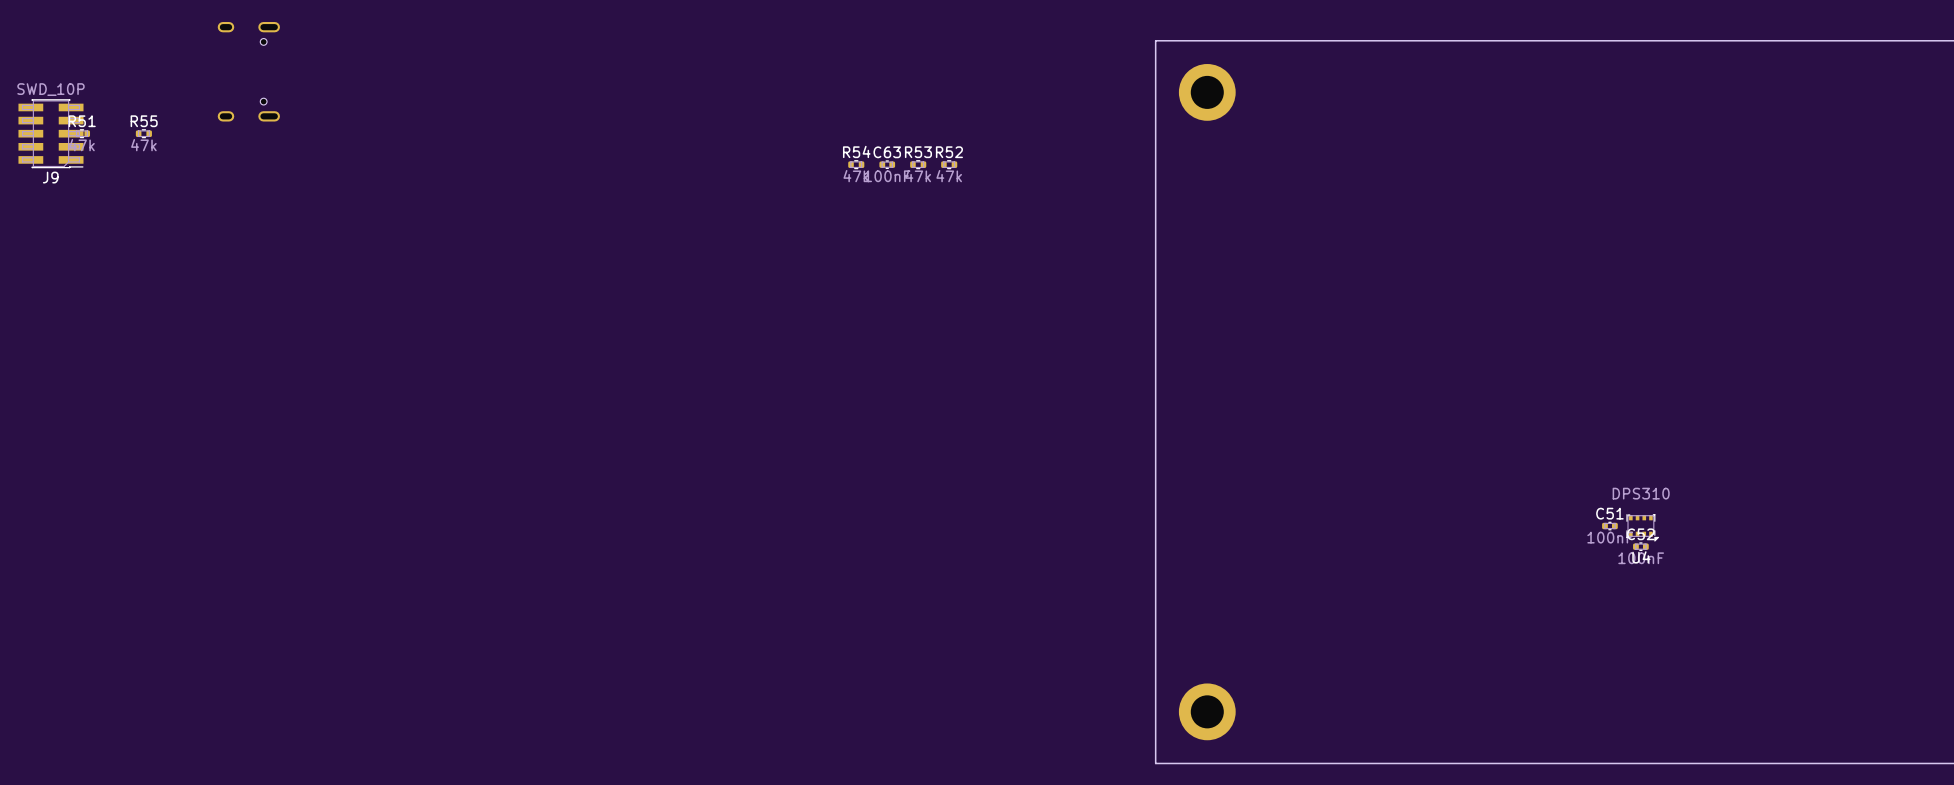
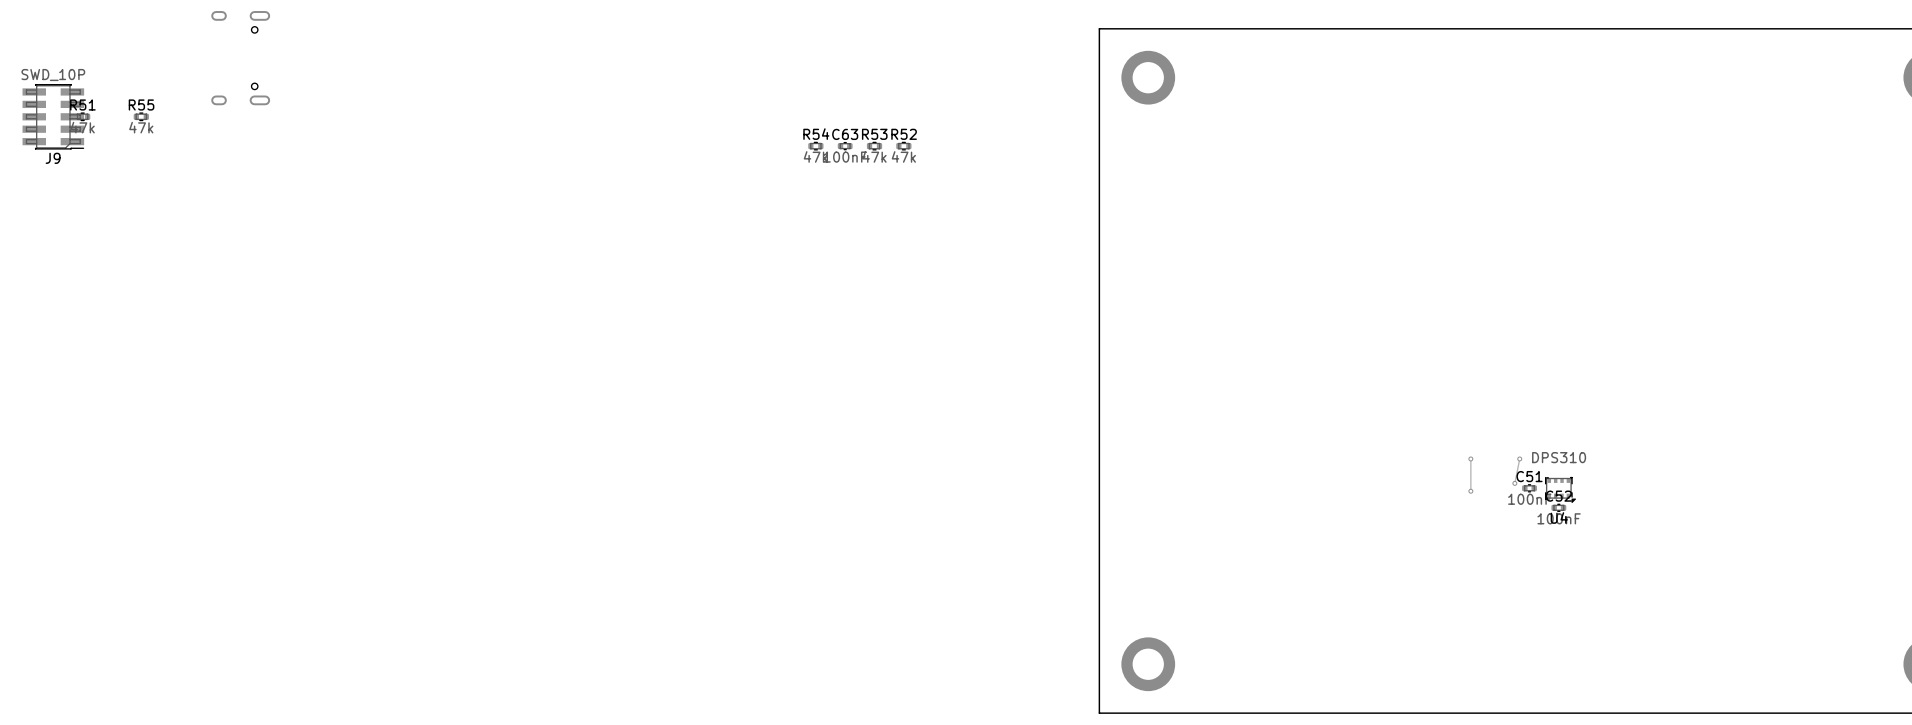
track: none -> (1470, 458) (1470, 491)
via: none -> (1470, 458)
track: none -> (1519, 458) (1514, 483)
via: none -> (1519, 458)
via: none -> (1514, 483)
via: none -> (1470, 491)

